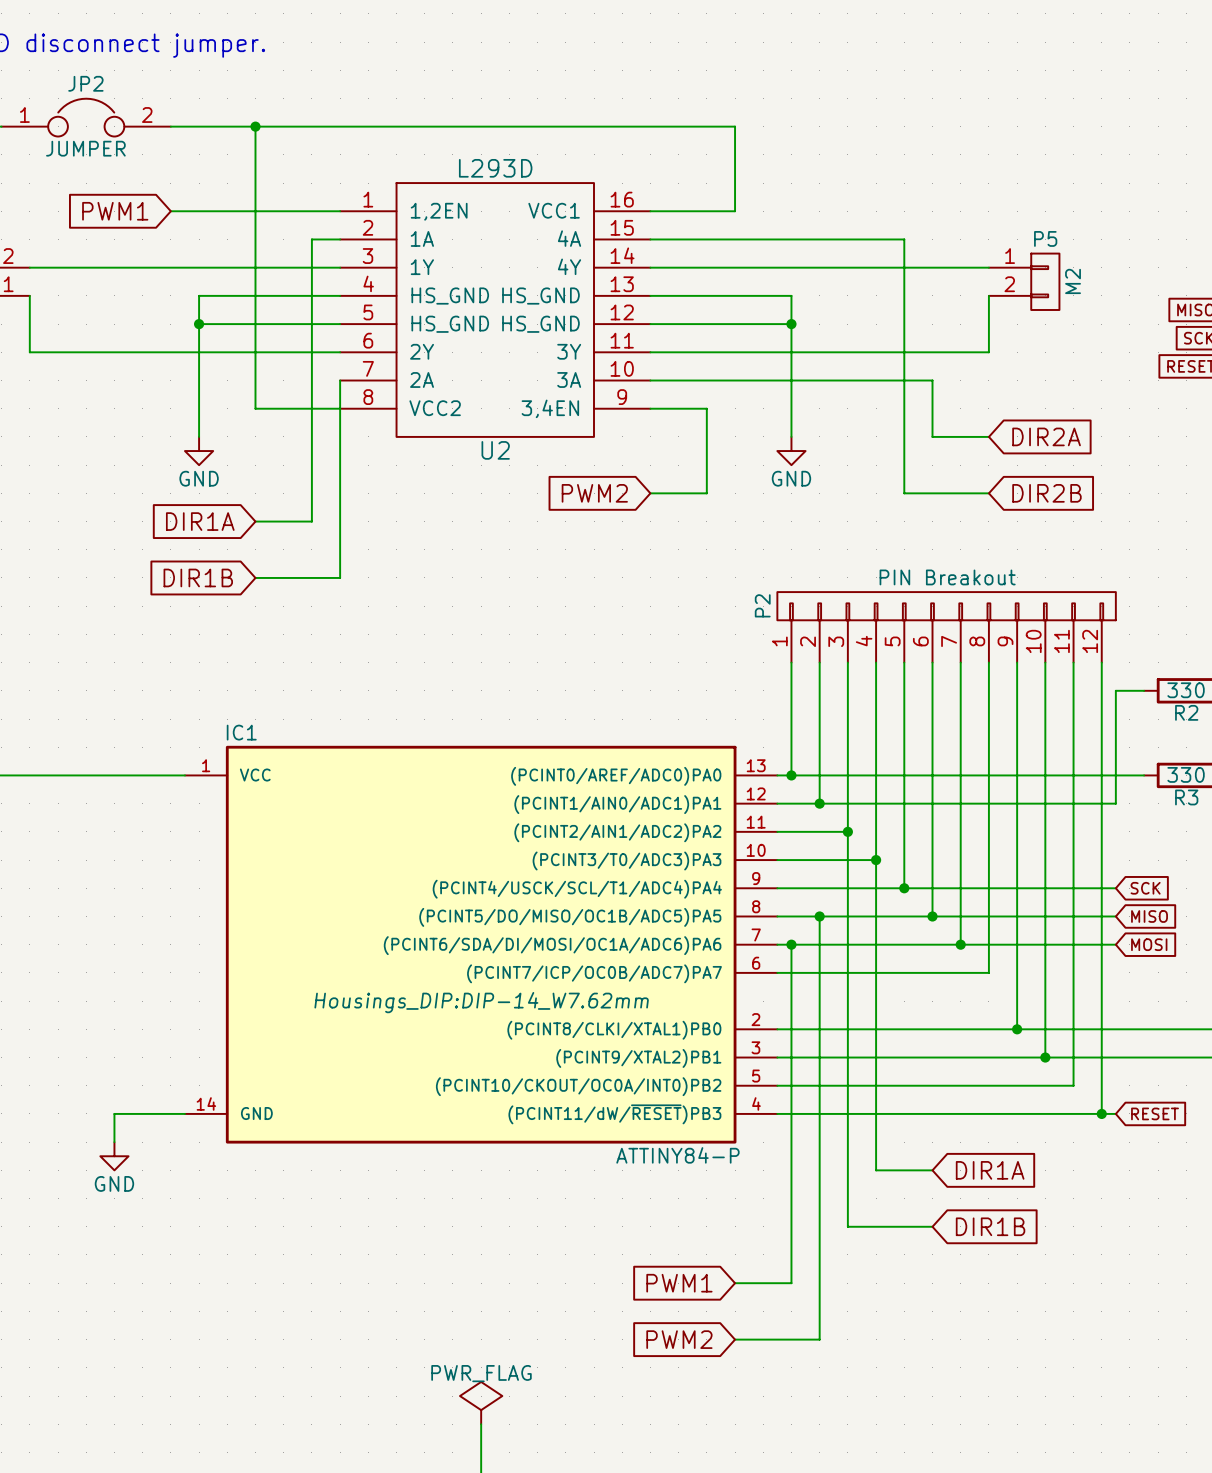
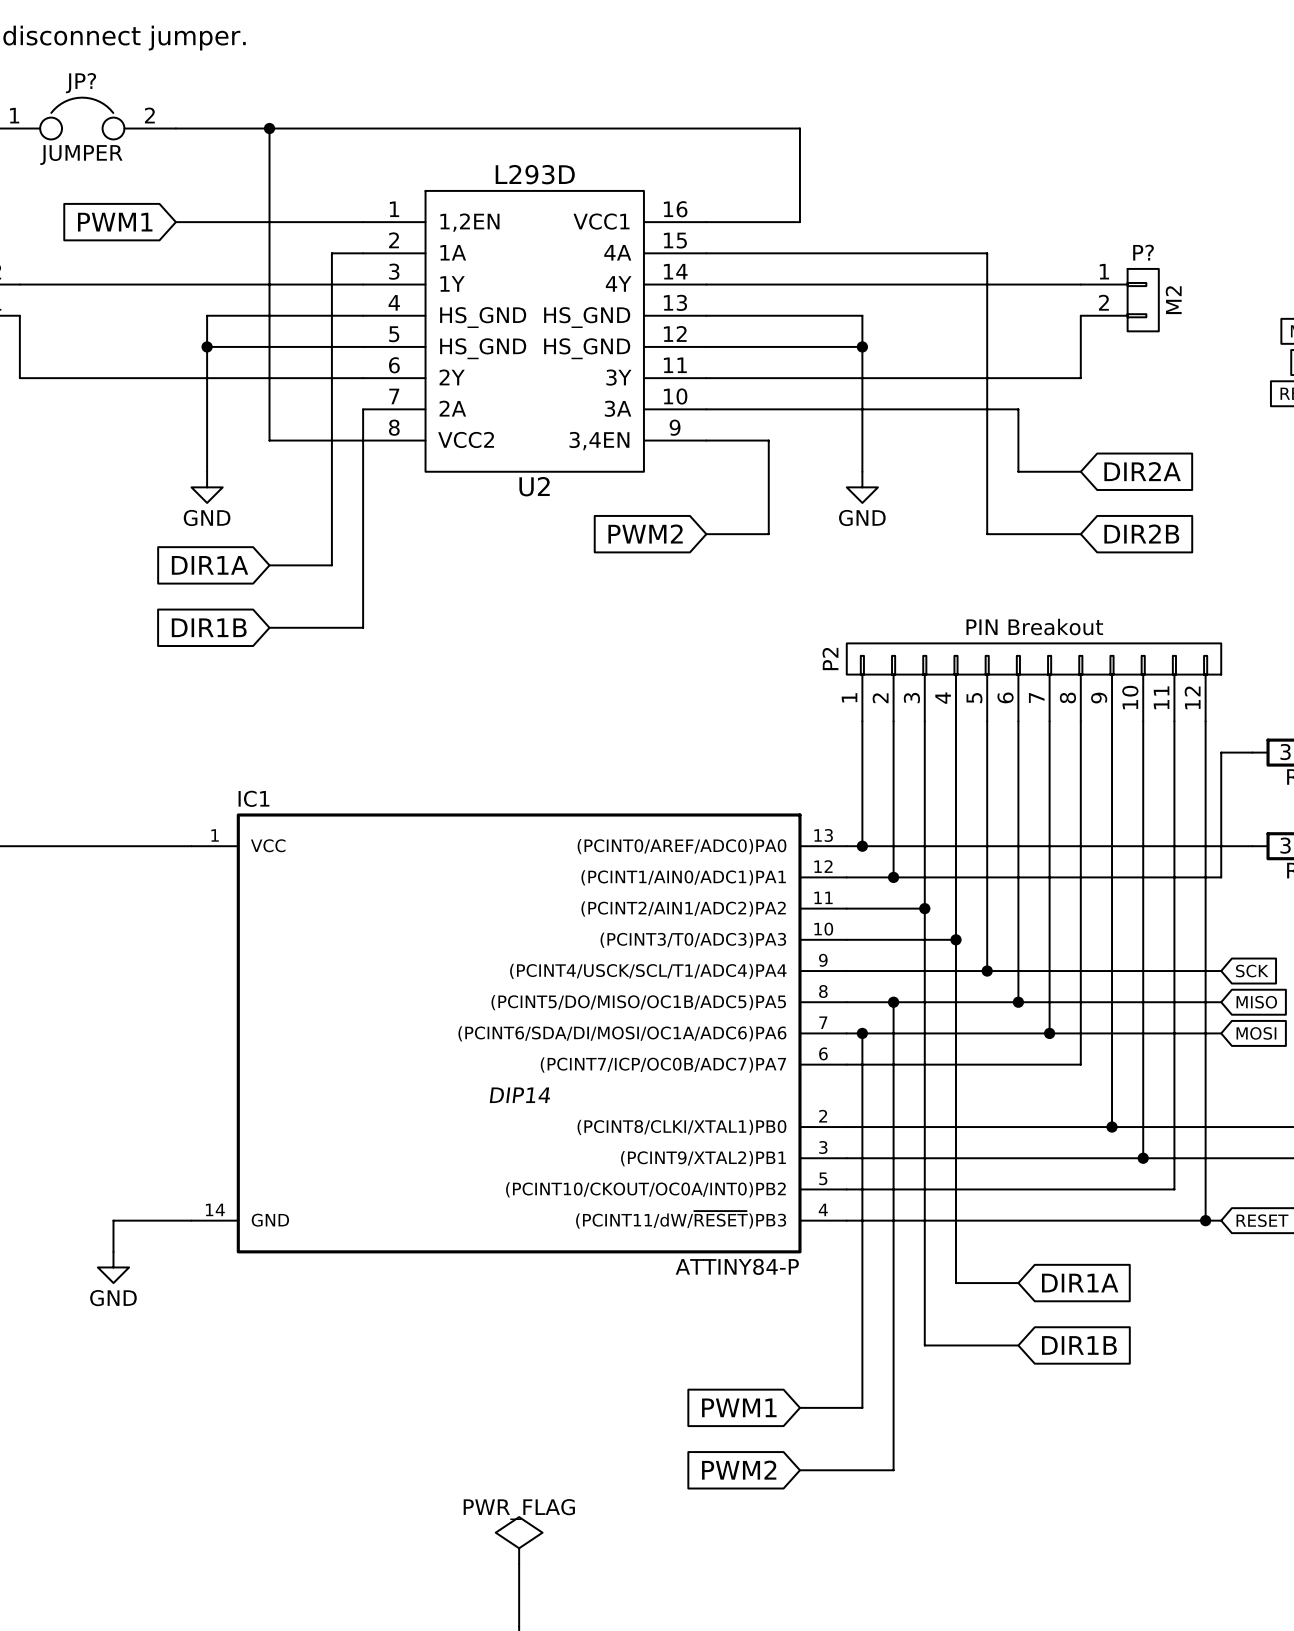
JP2 name: JP2 (85, 83) -> JP? (80, 83)
P5 name: P5 (1045, 238) -> P? (1143, 252)
IC1 text: Housings_DIP:DIP-14_W7.62mm (481, 1002) -> DIP14 (519, 1095)

